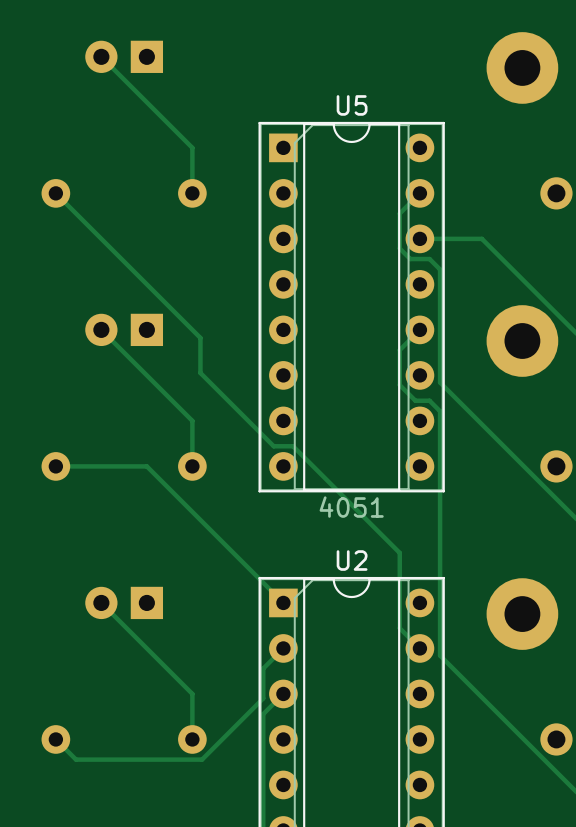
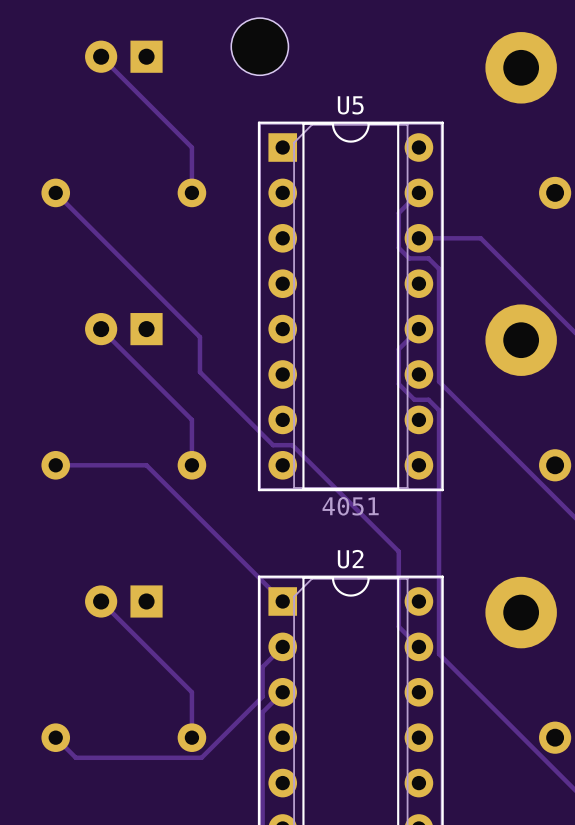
part: none -> (259, 46)

